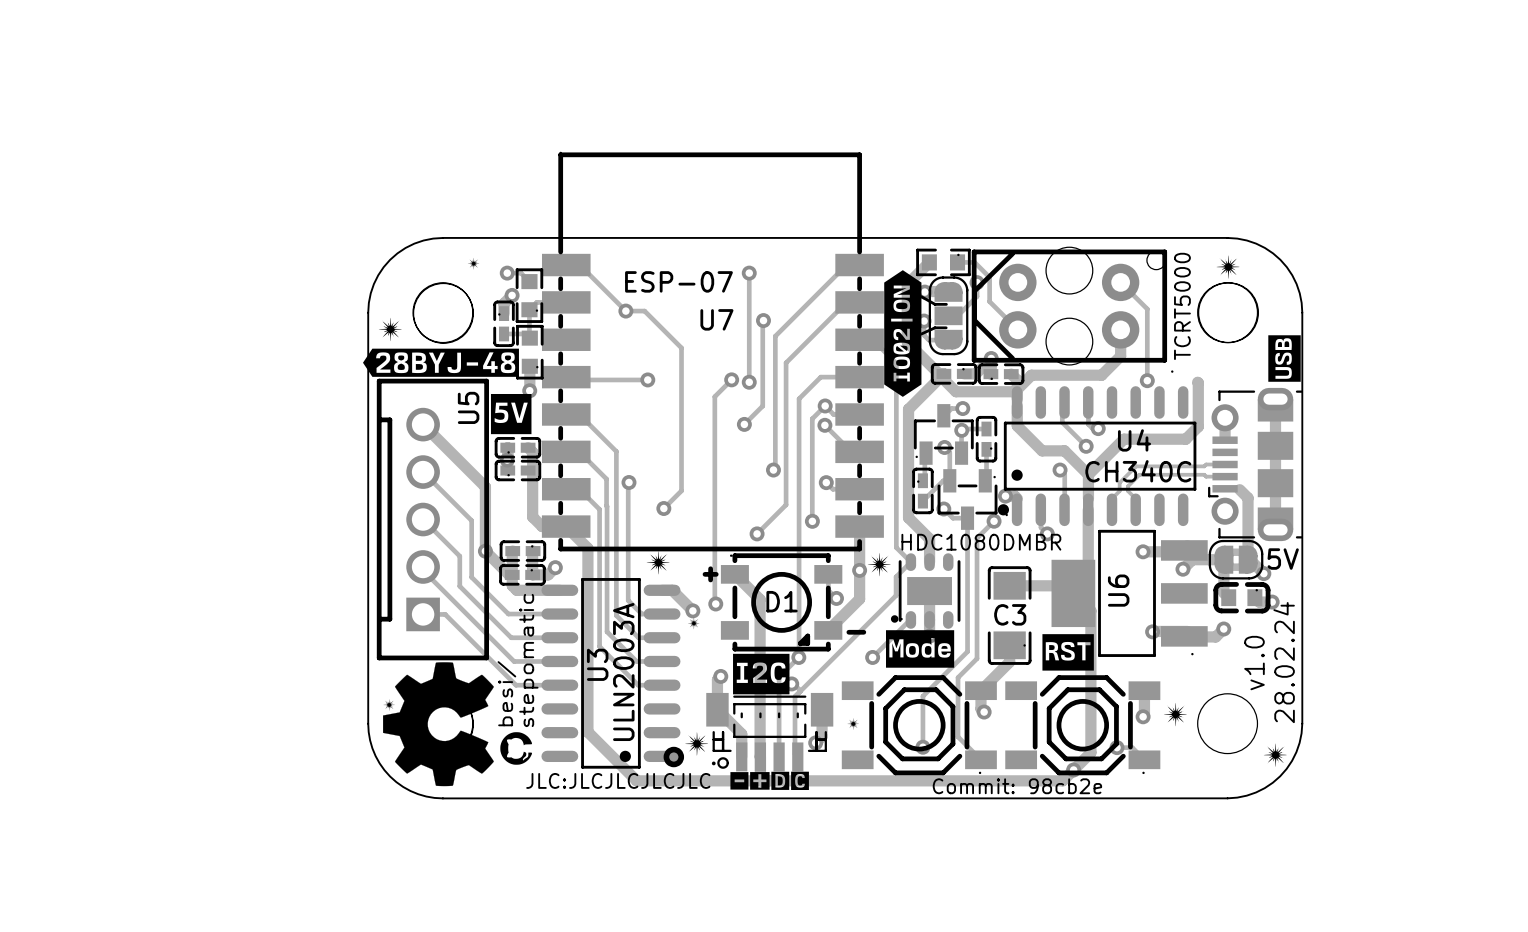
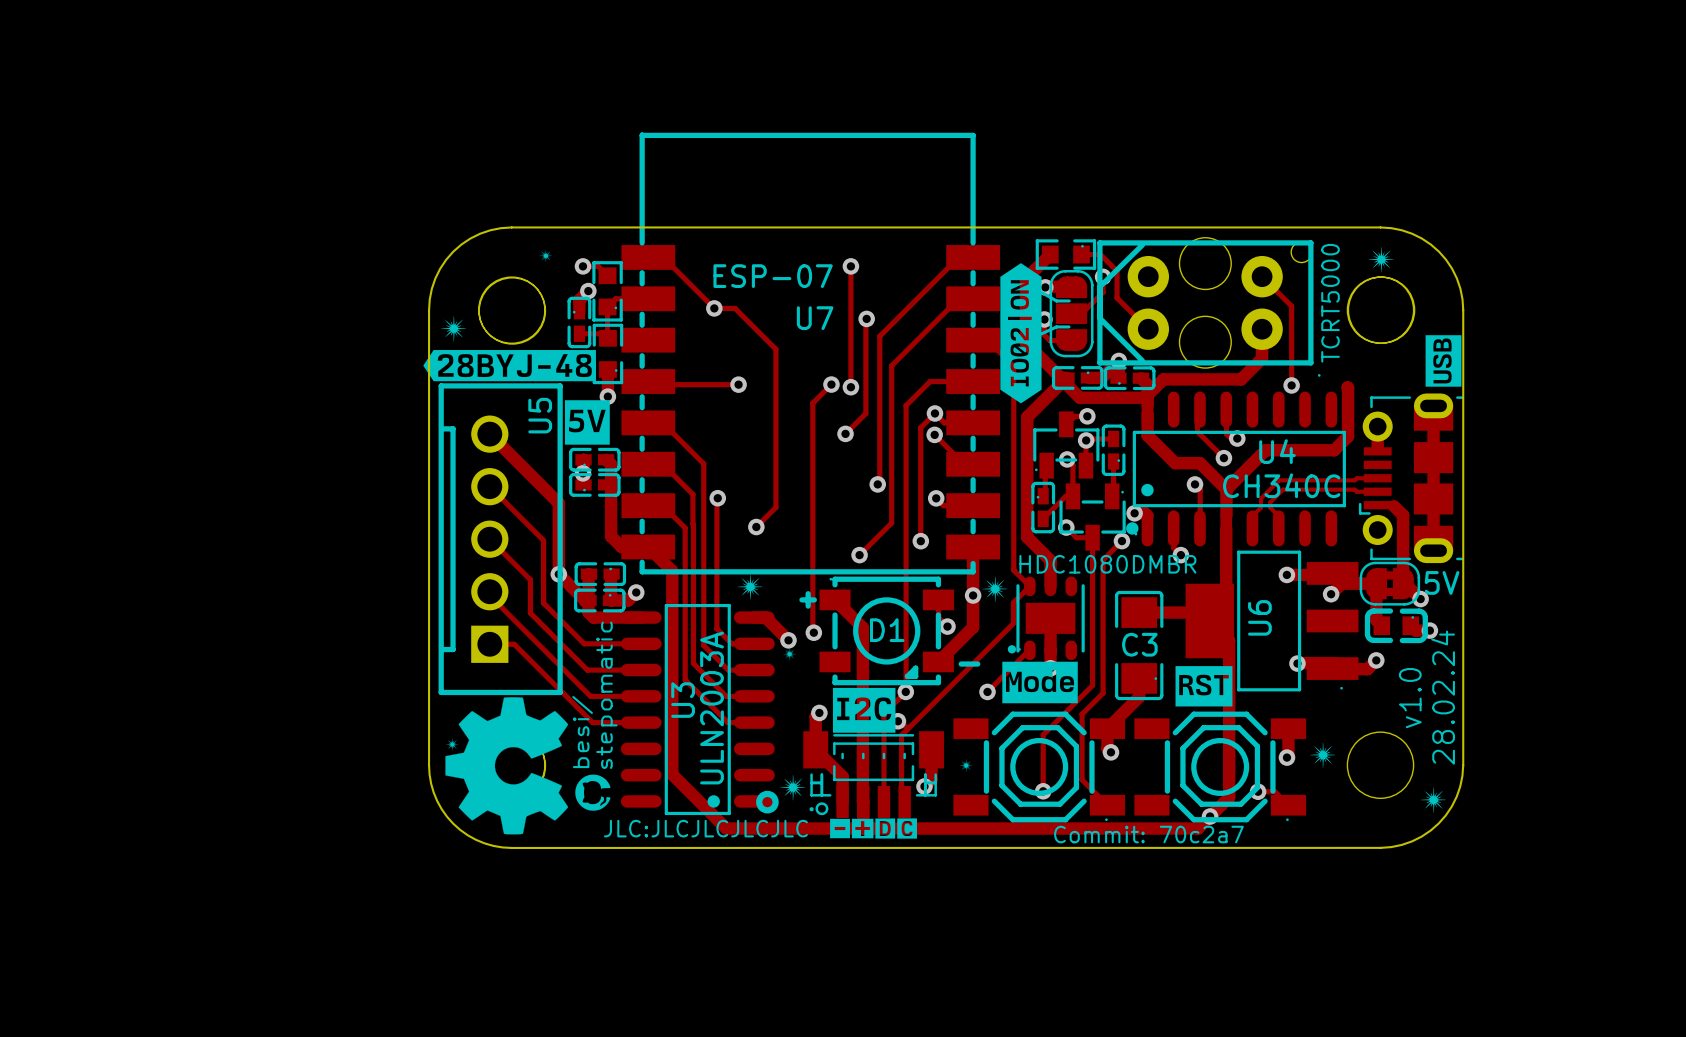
text: Commit: 98cb2e (1017, 786) -> Commit: 70c2a7 (1148, 834)

